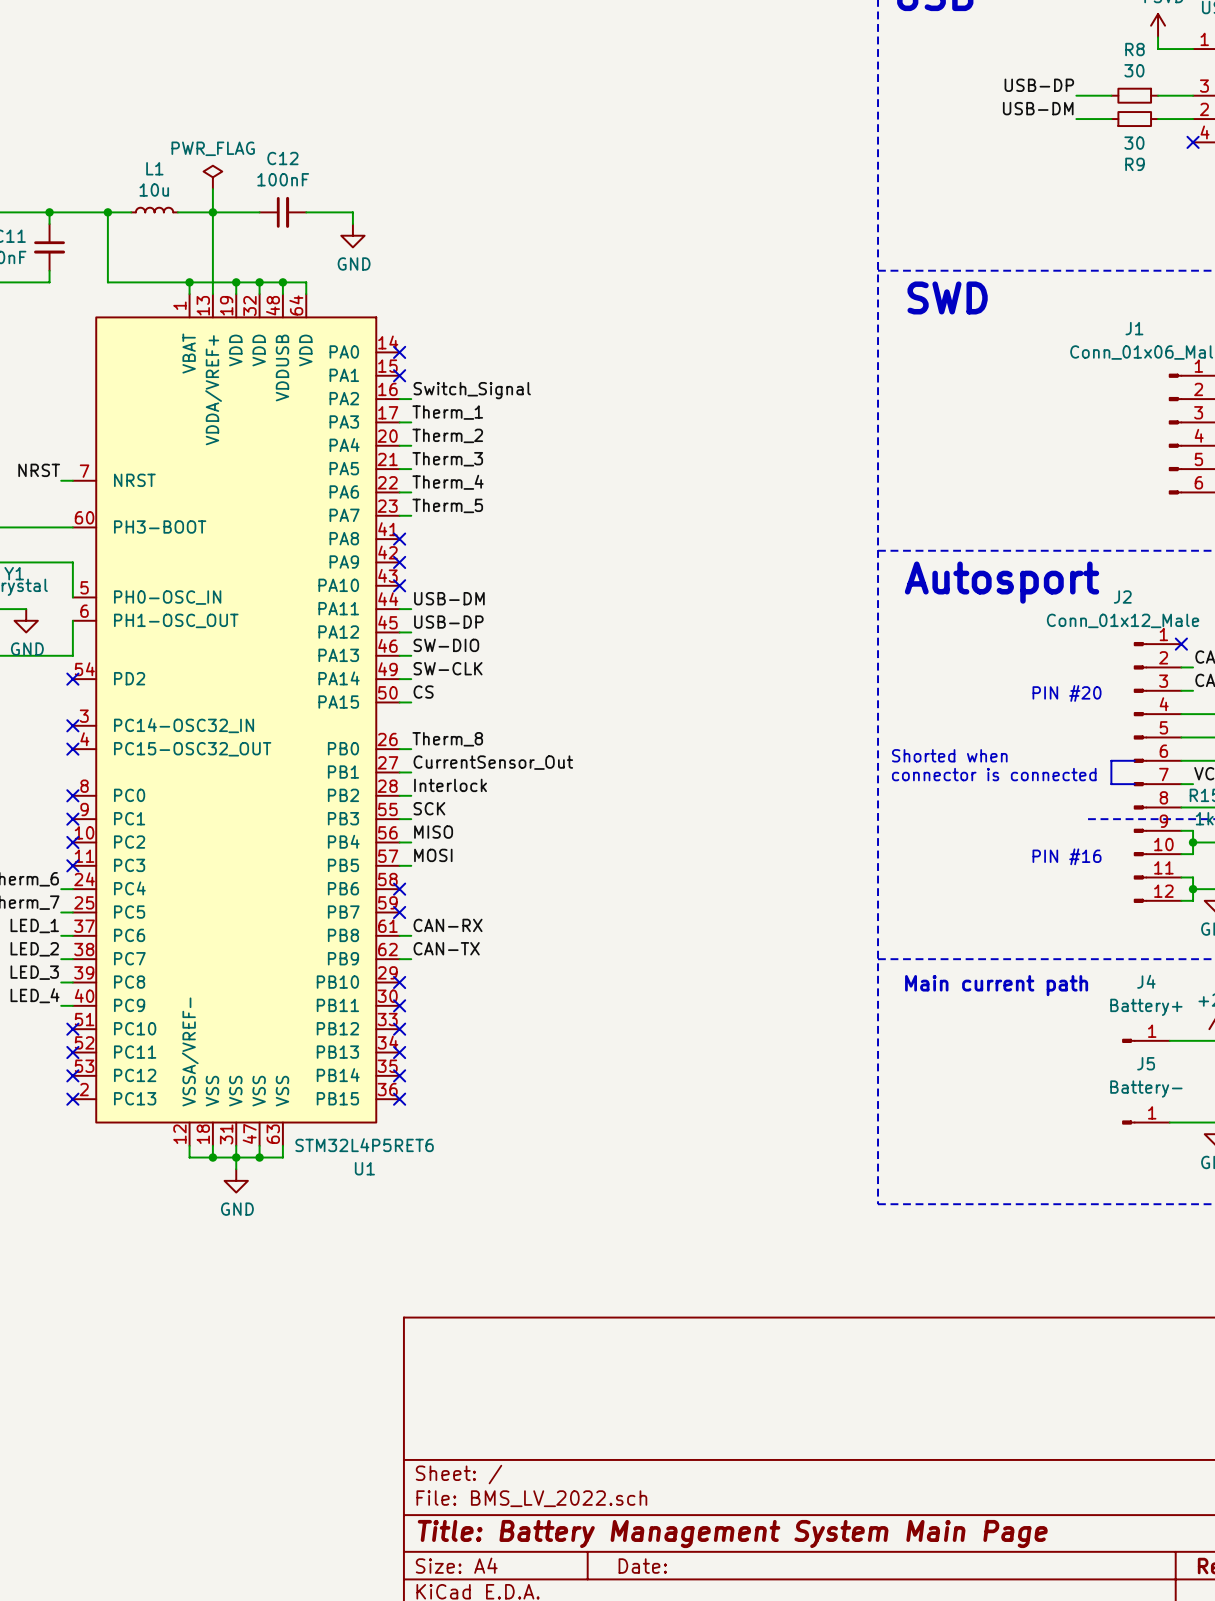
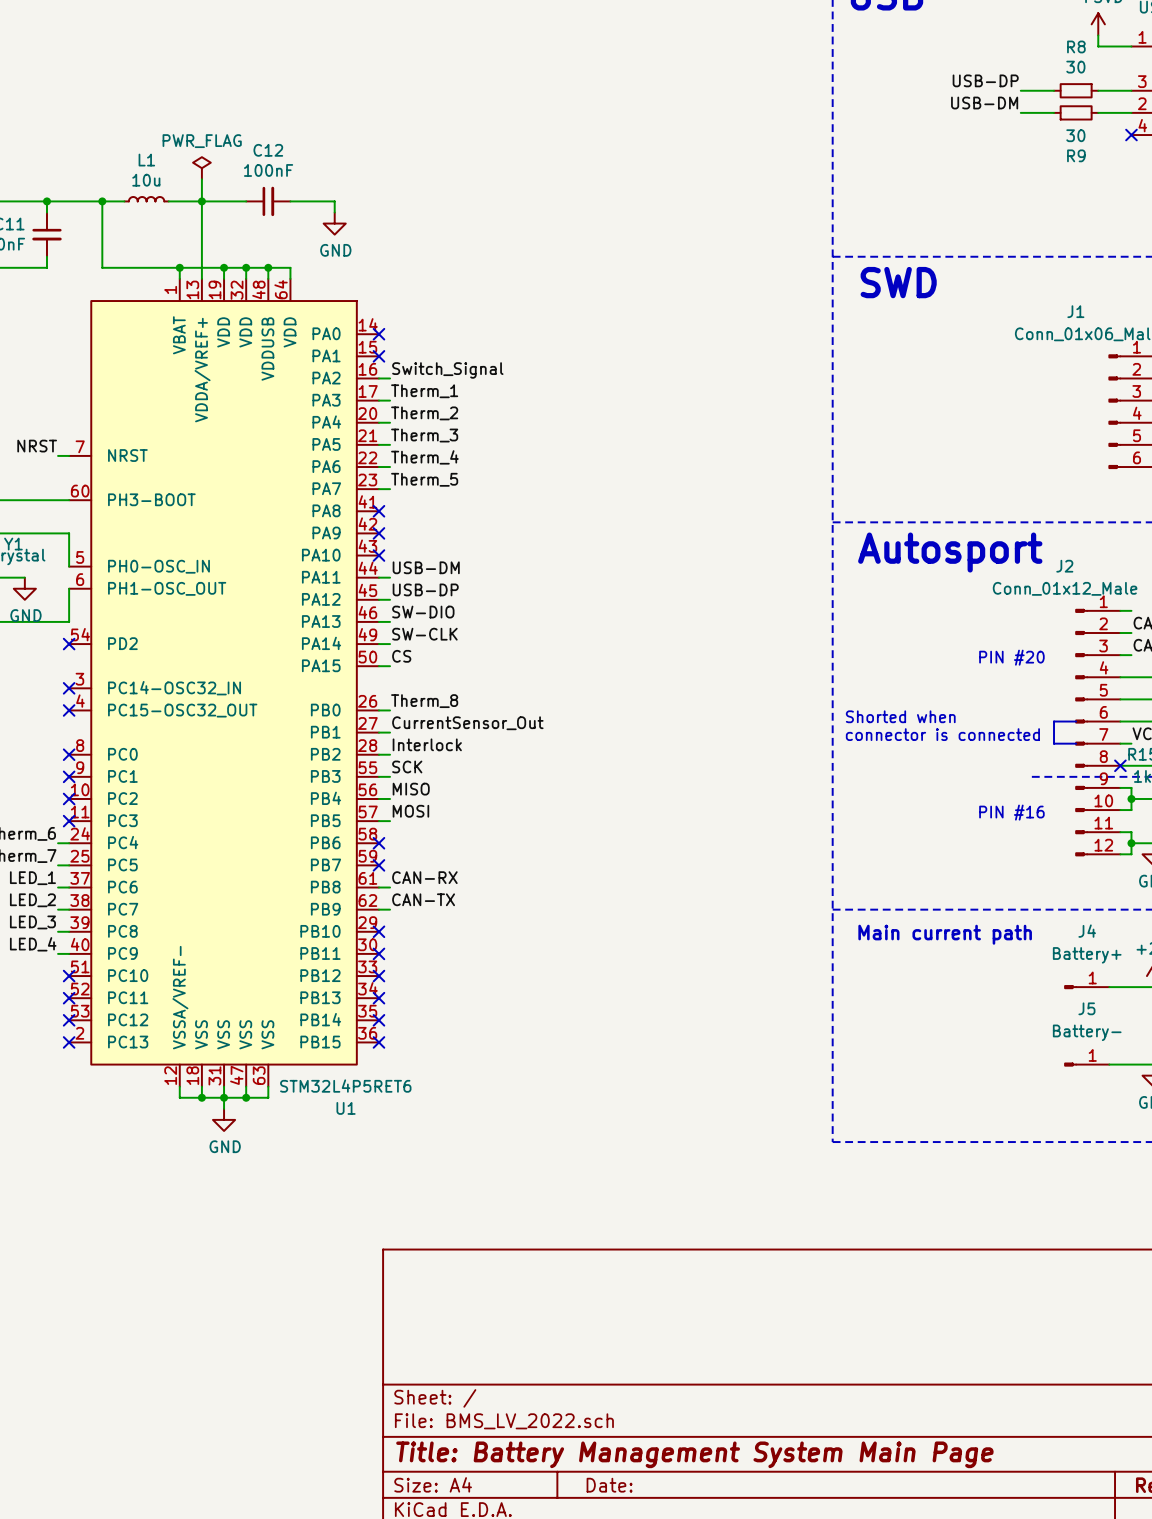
wire: none -> (1120, 610) (1131, 610)
no-connect mark: (1181, 644) -> none
no-connect mark: none -> (1120, 765)

